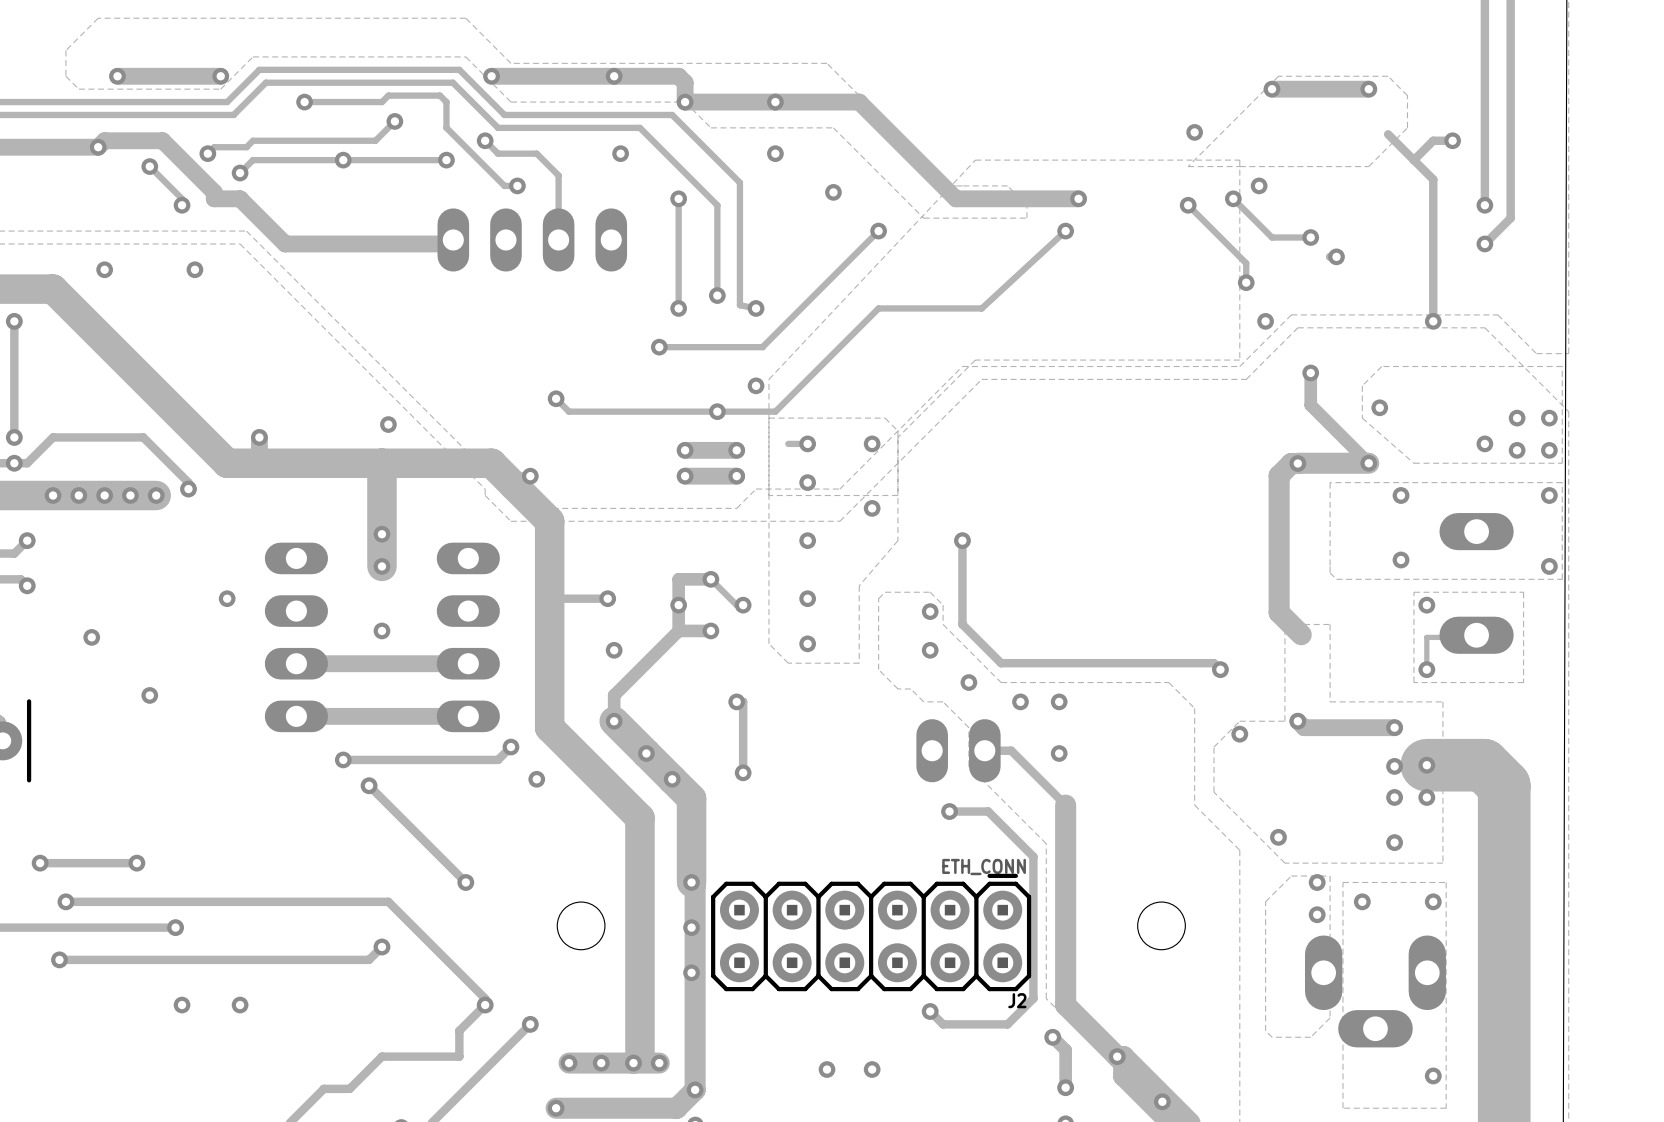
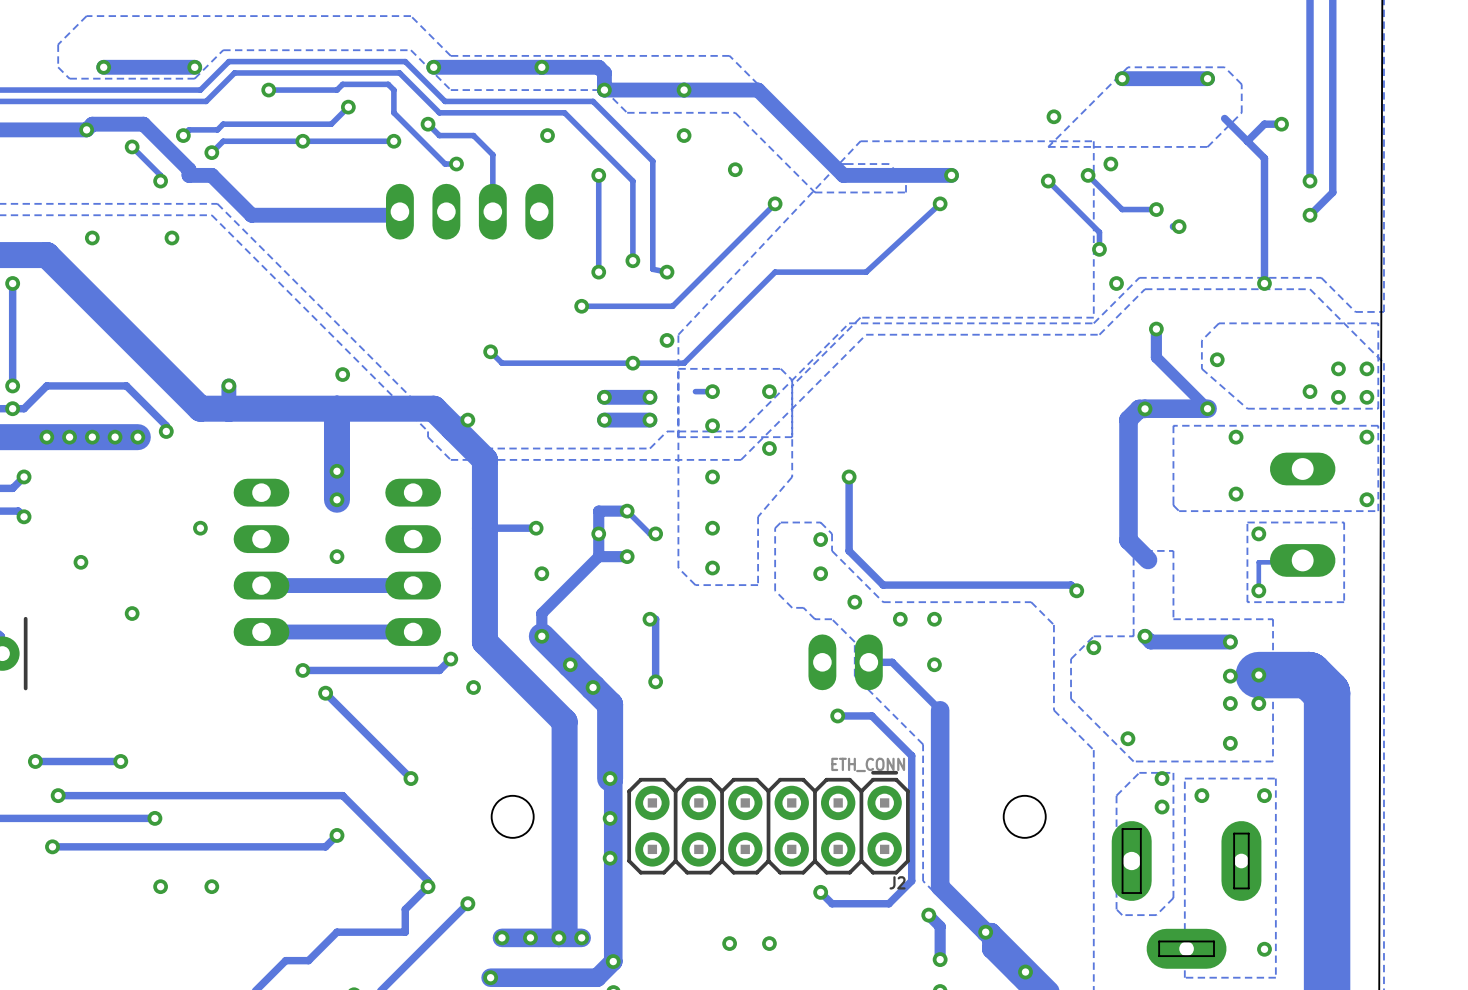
part: (1375, 991) -> none
part: none -> (1186, 894)

